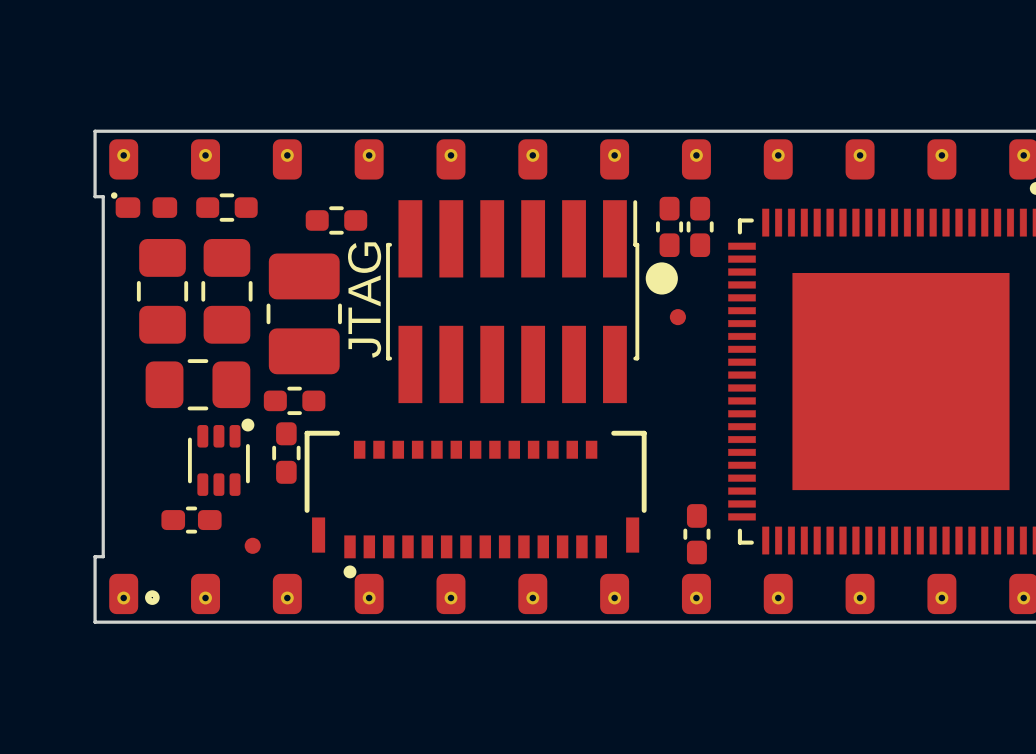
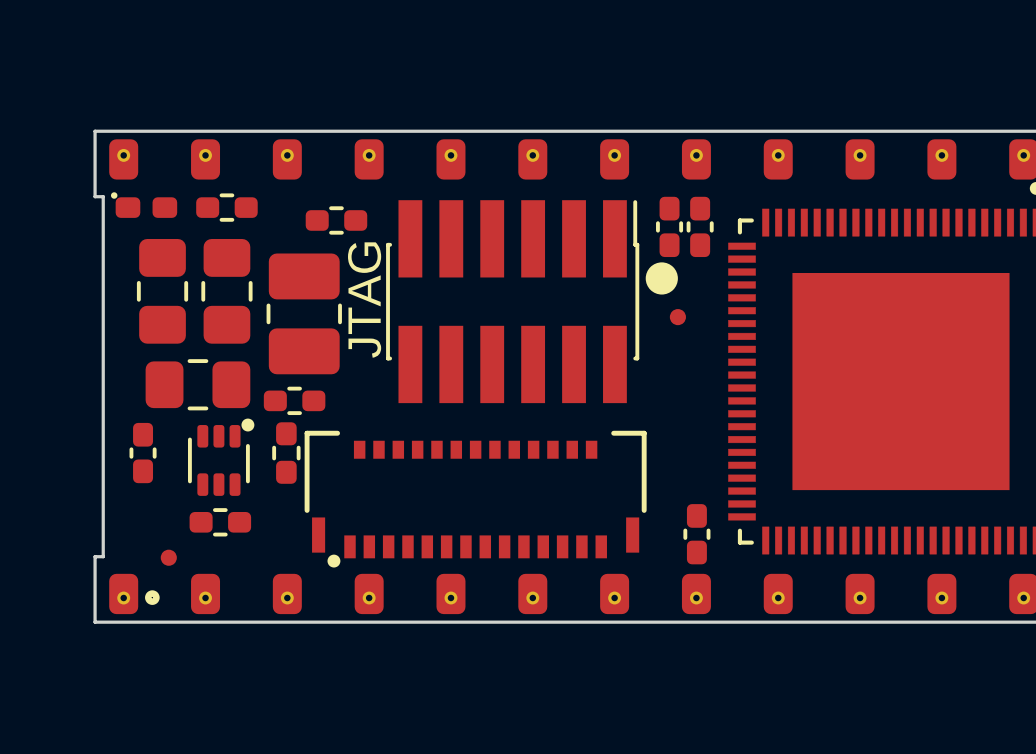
part footprint: [304, 430, 647, 579] -> [304, 430, 647, 568]
part rotation: 0° (191, 520) -> 90° clockwise (143, 453)
part position: (191, 520) -> (143, 453)
part: none -> (220, 522)
part position: (252, 545) -> (168, 557)

